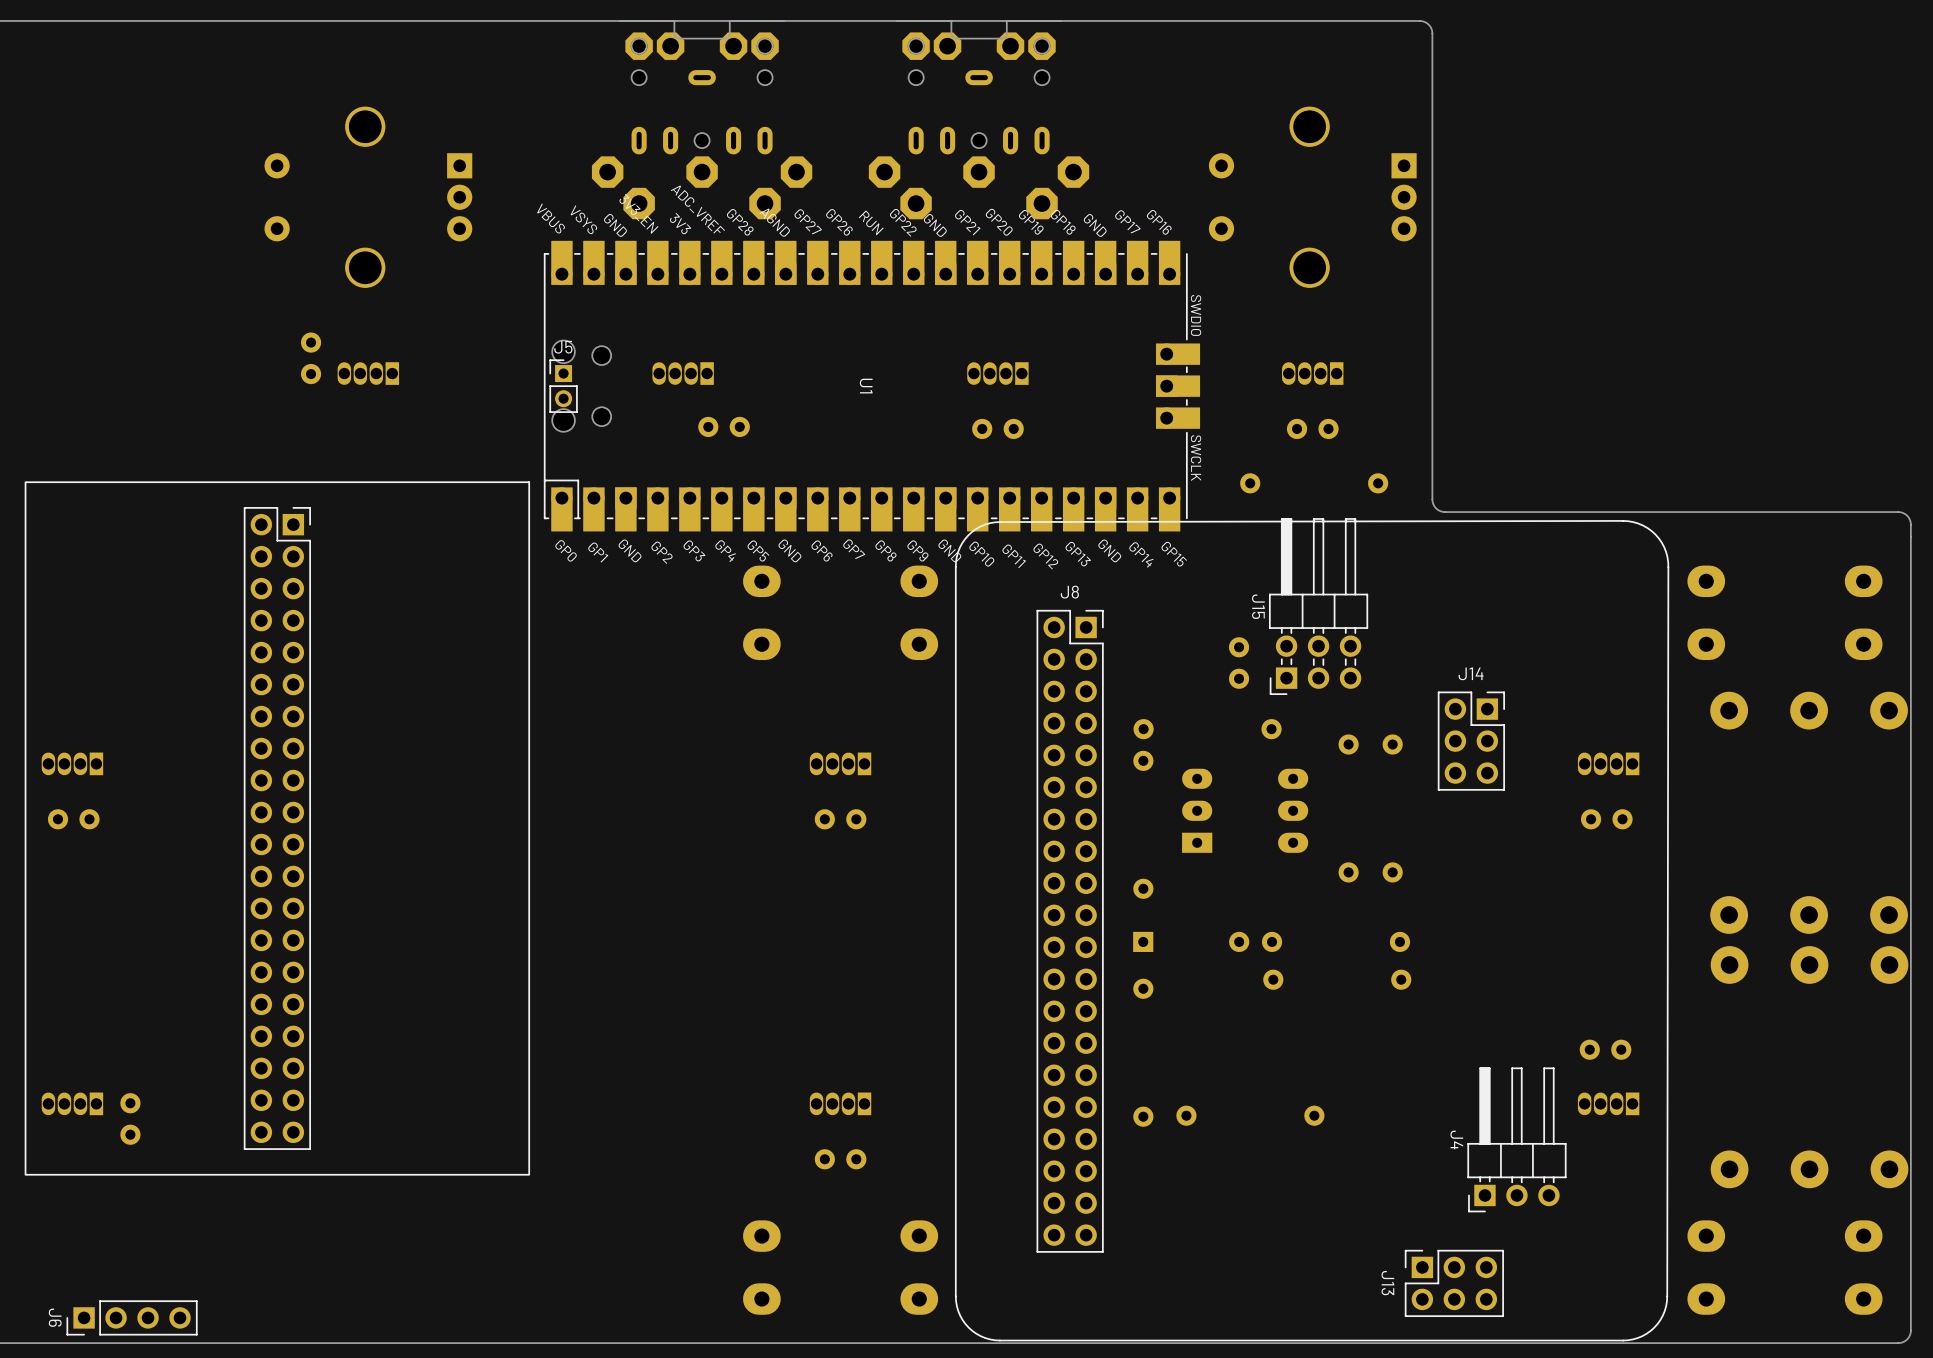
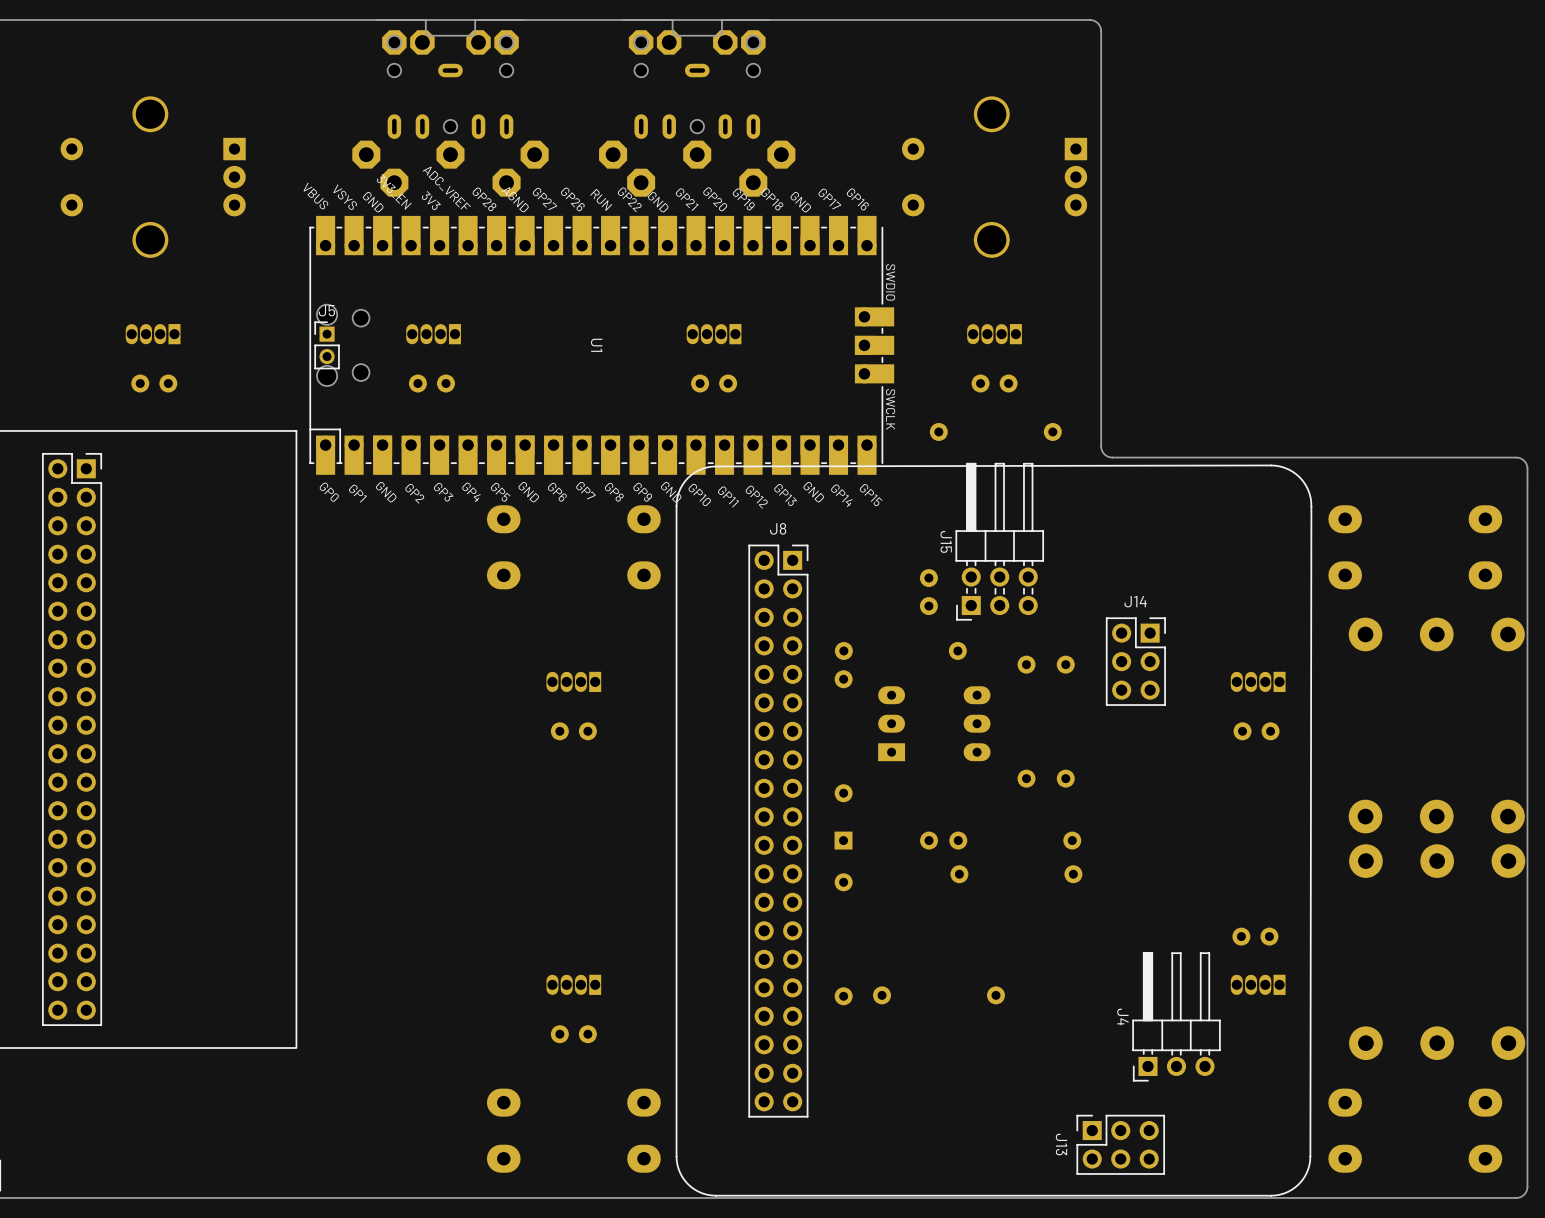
part rotation: 0° (311, 358) -> 90° clockwise (154, 383)
part position: (311, 358) -> (154, 383)
part position: (724, 426) -> (431, 383)

